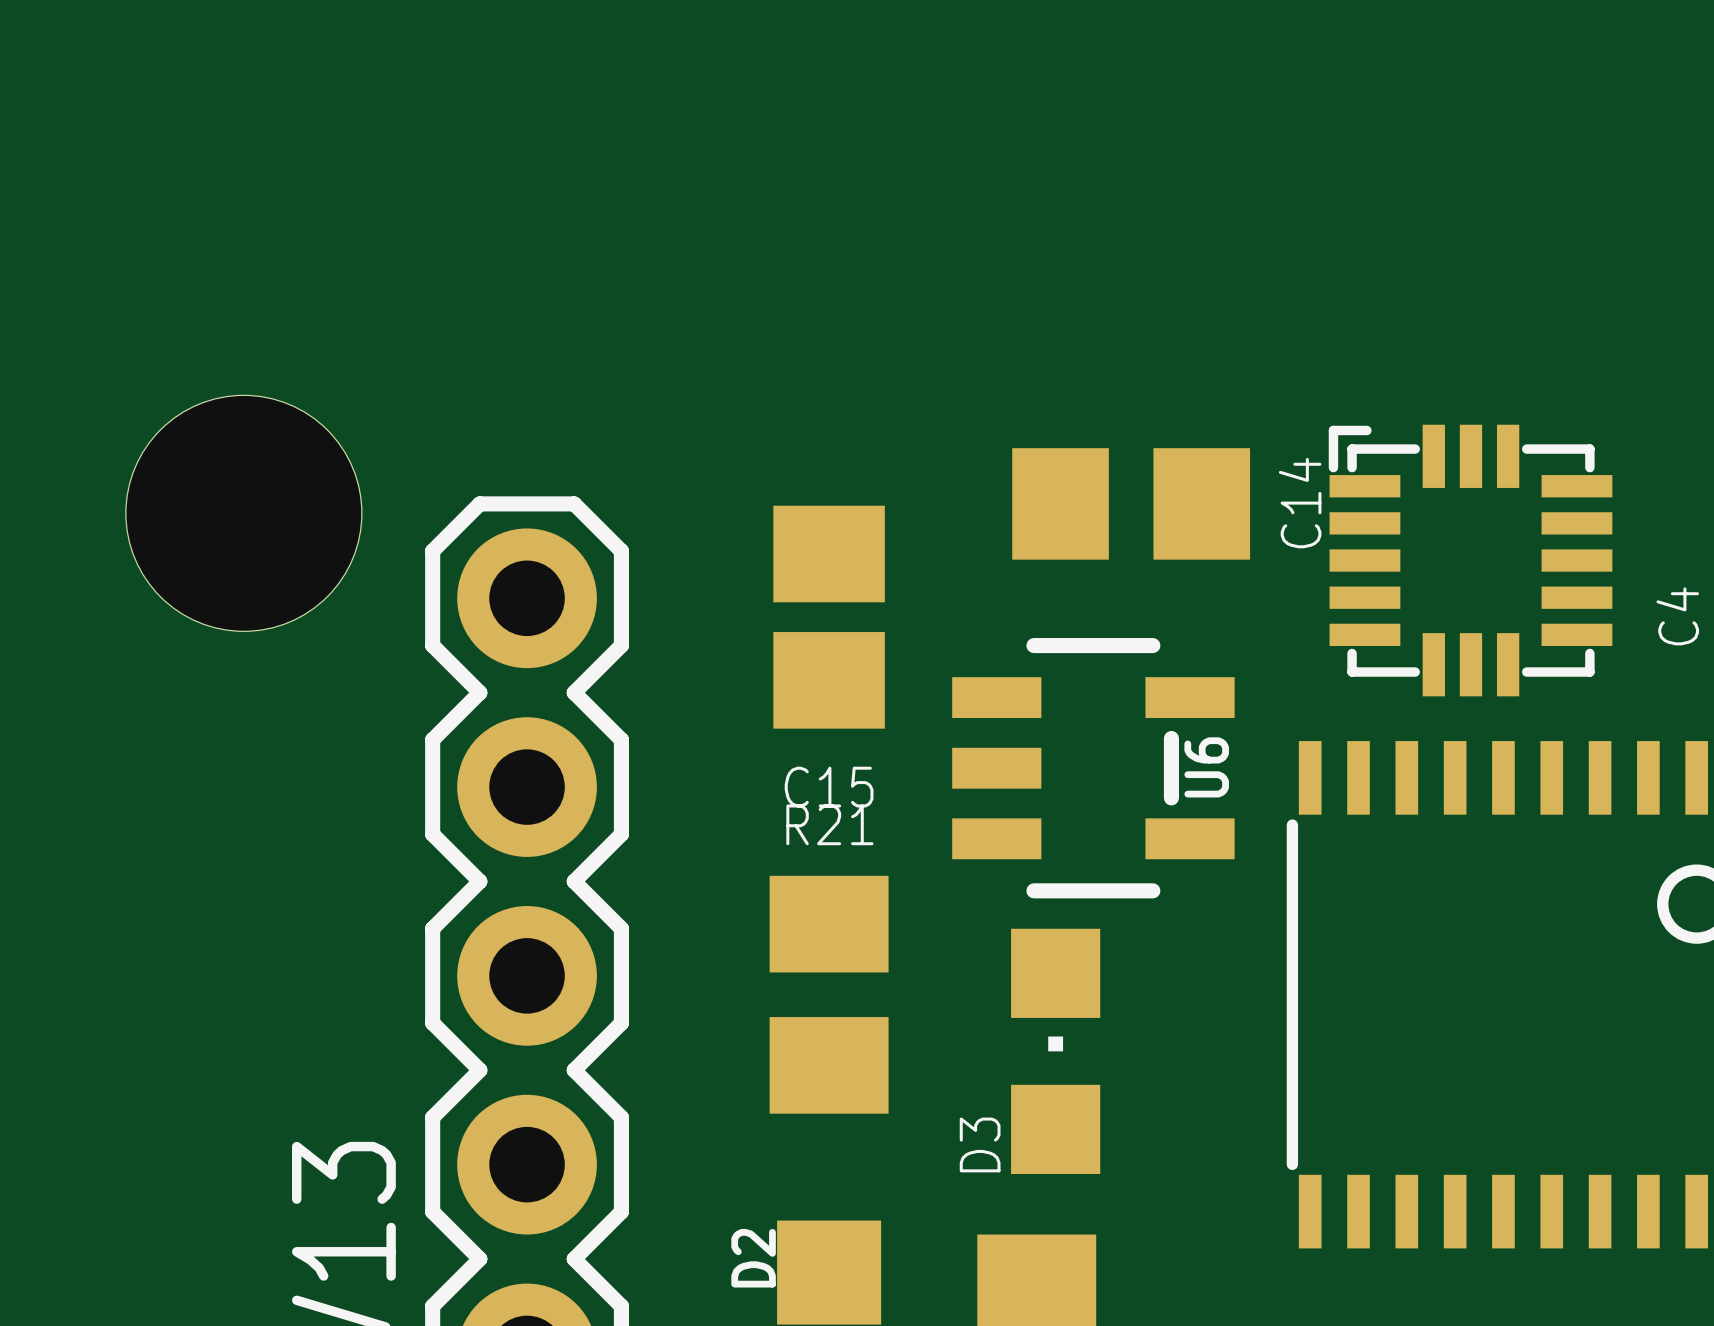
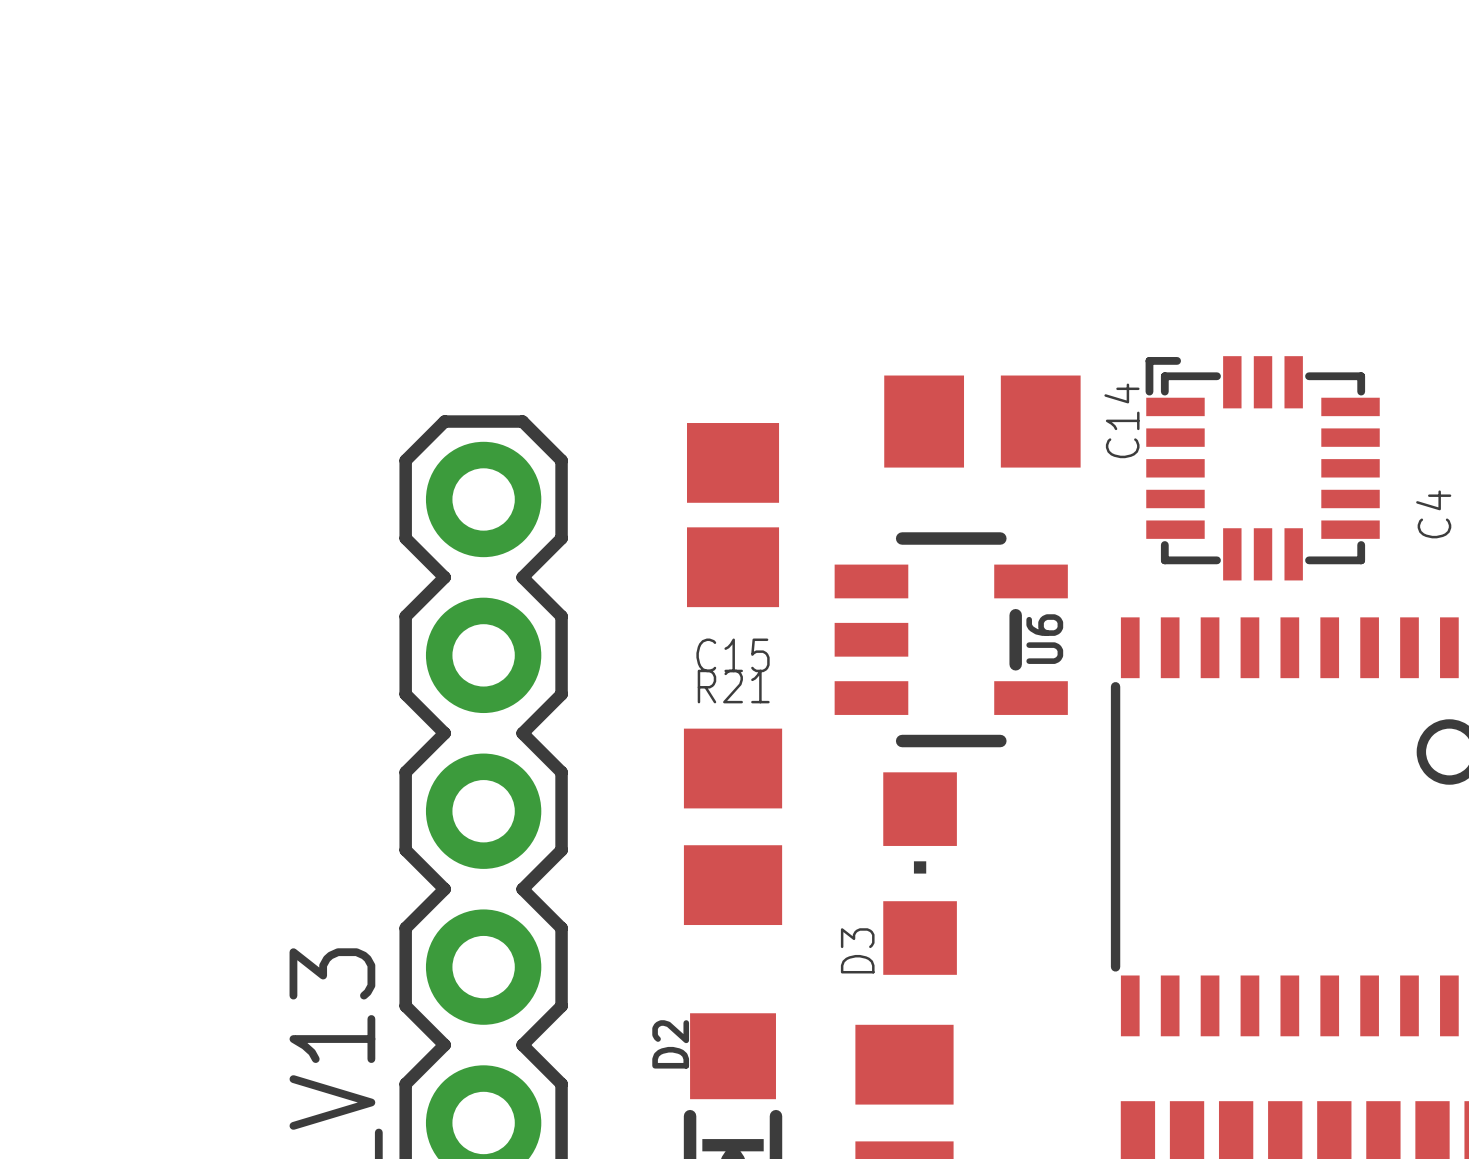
hole: (243, 513) -> none

